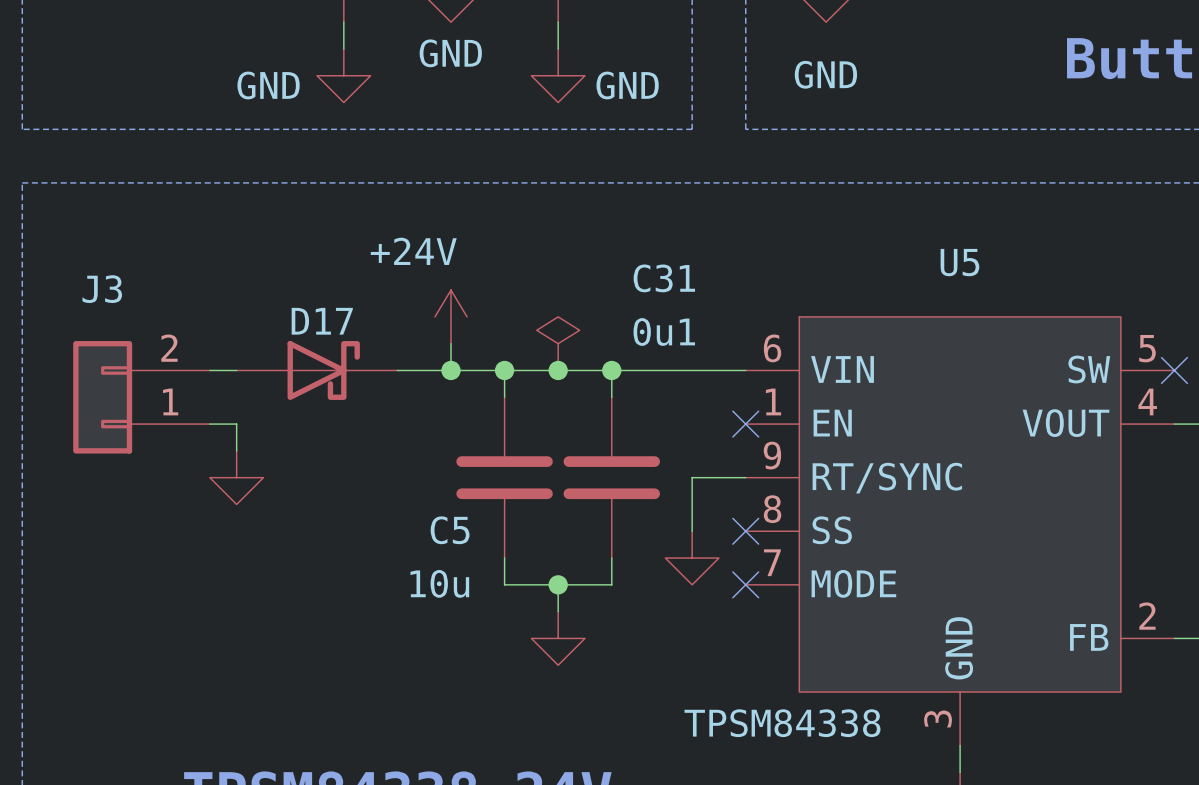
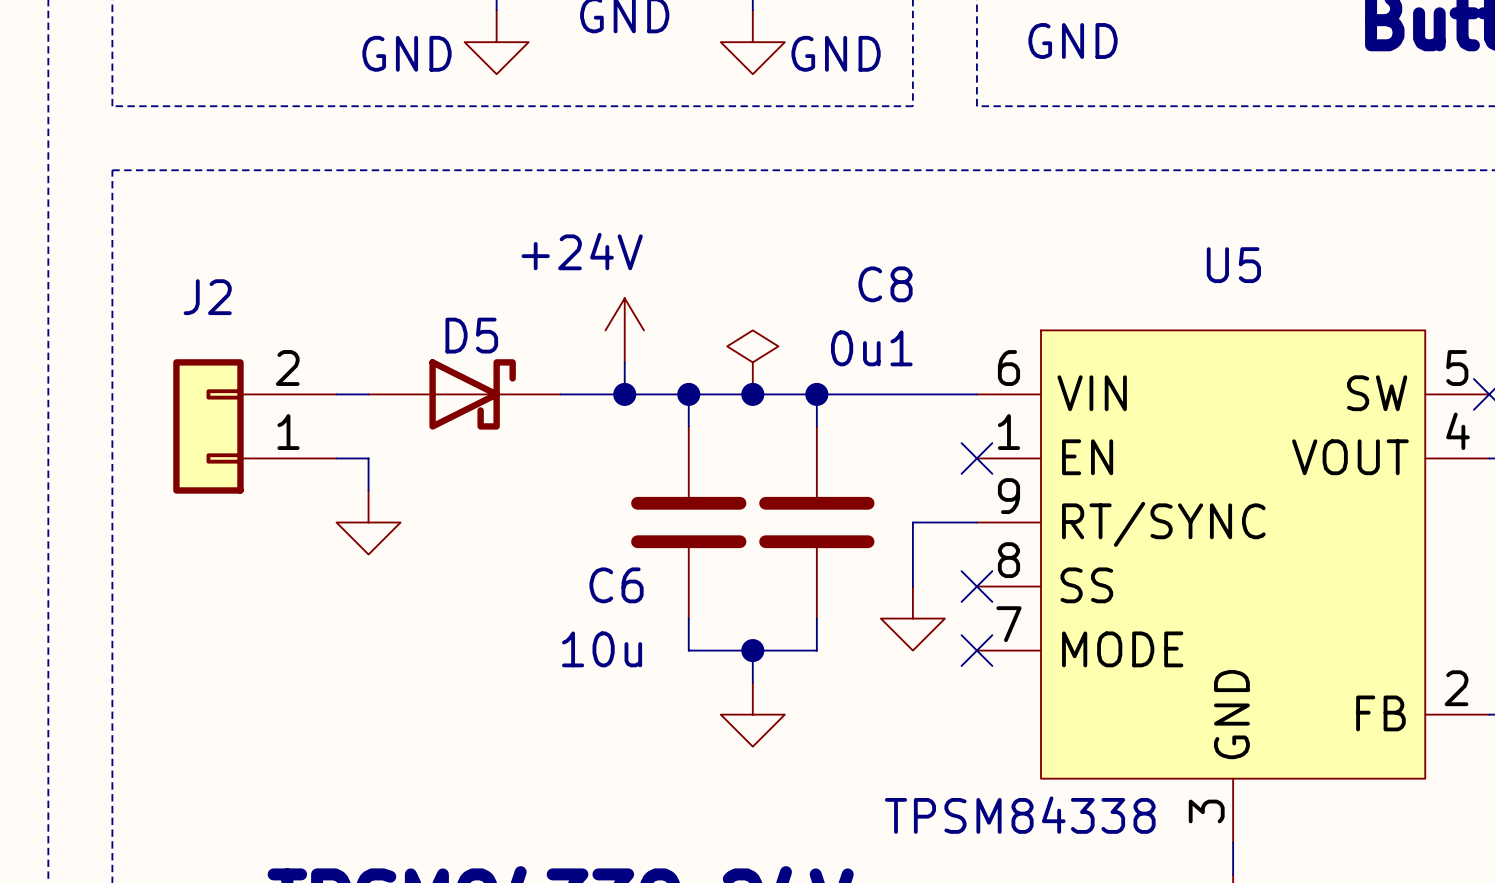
C31 name: C31 (664, 278) -> C8 (885, 284)
J3 name: J3 (102, 289) -> J2 (207, 297)
D17 name: D17 (322, 321) -> D5 (471, 335)
C5 name: C5 (450, 530) -> C6 (616, 585)

